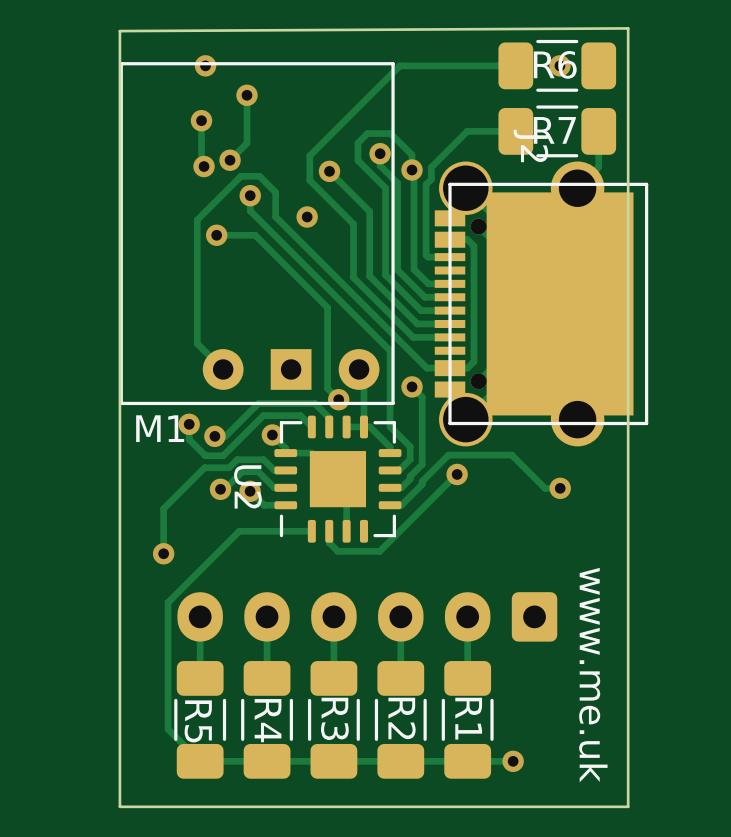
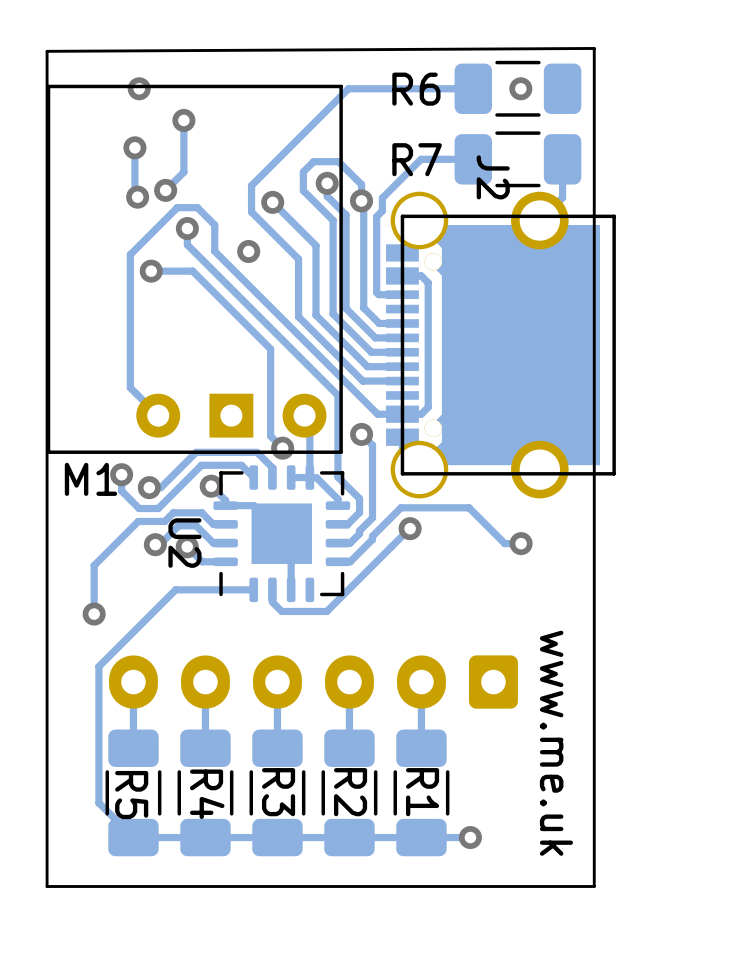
R6 name position: R6 (555, 64) -> R6 (416, 89)
R7 name position: R7 (554, 130) -> R7 (417, 159)

